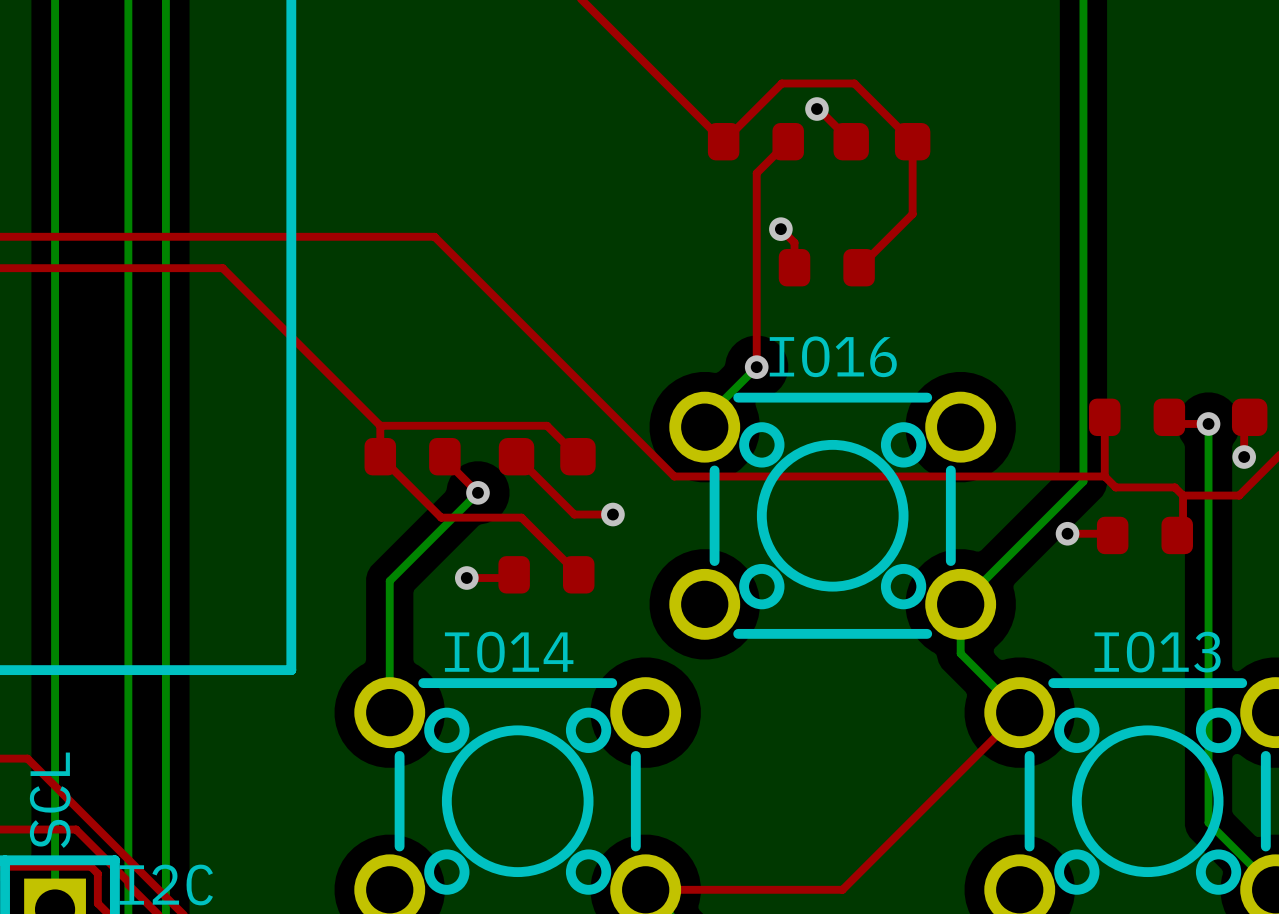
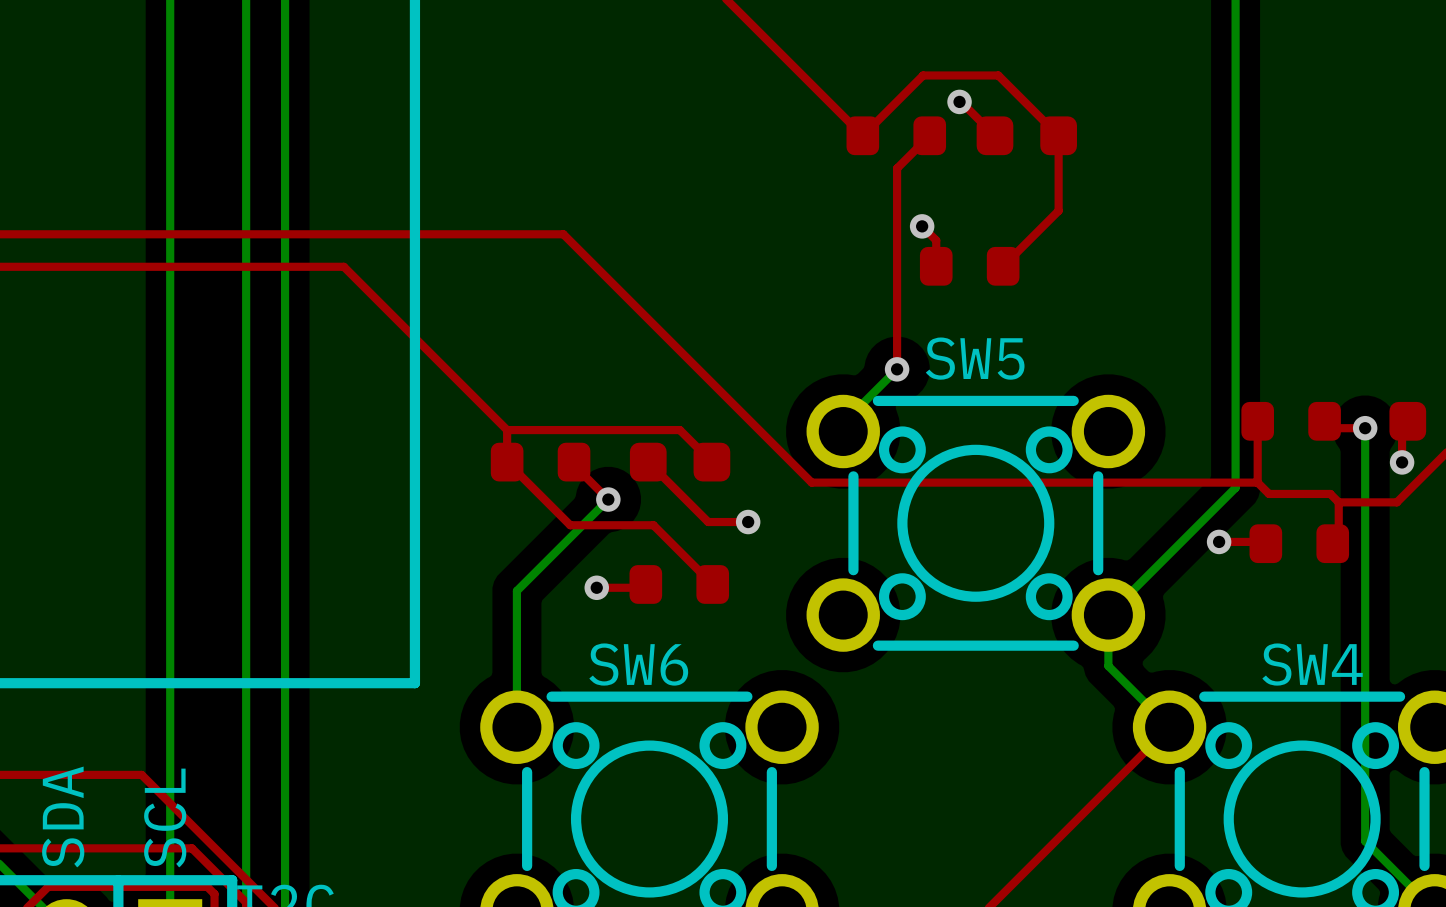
IO16 name: IO16 (833, 356) -> SW5 (975, 358)
IO14 name: IO14 (509, 652) -> SW6 (638, 664)
IO13 name: IO13 (1157, 652) -> SW4 (1312, 664)

